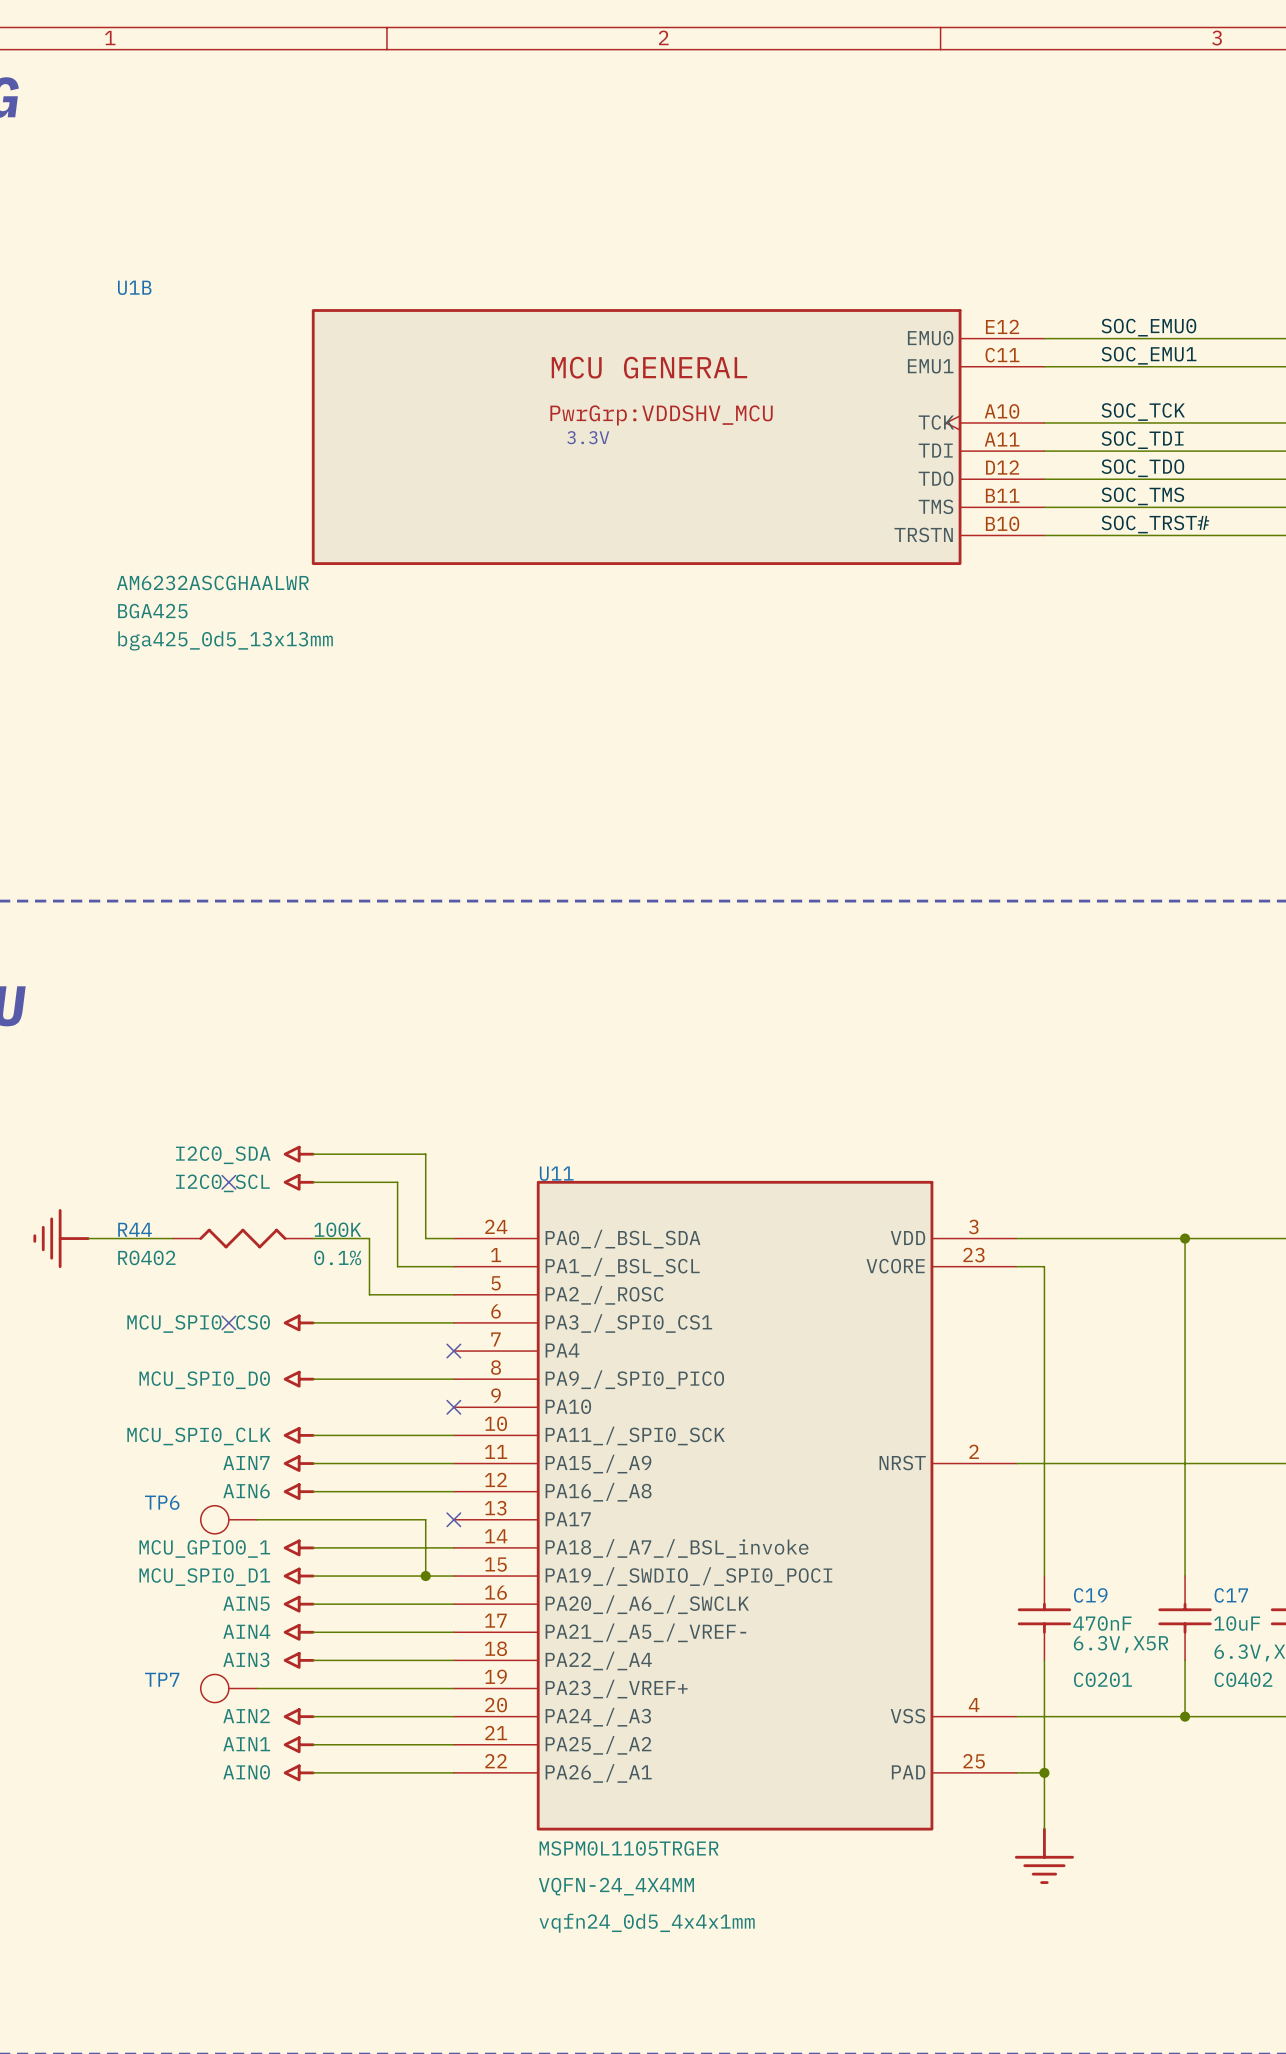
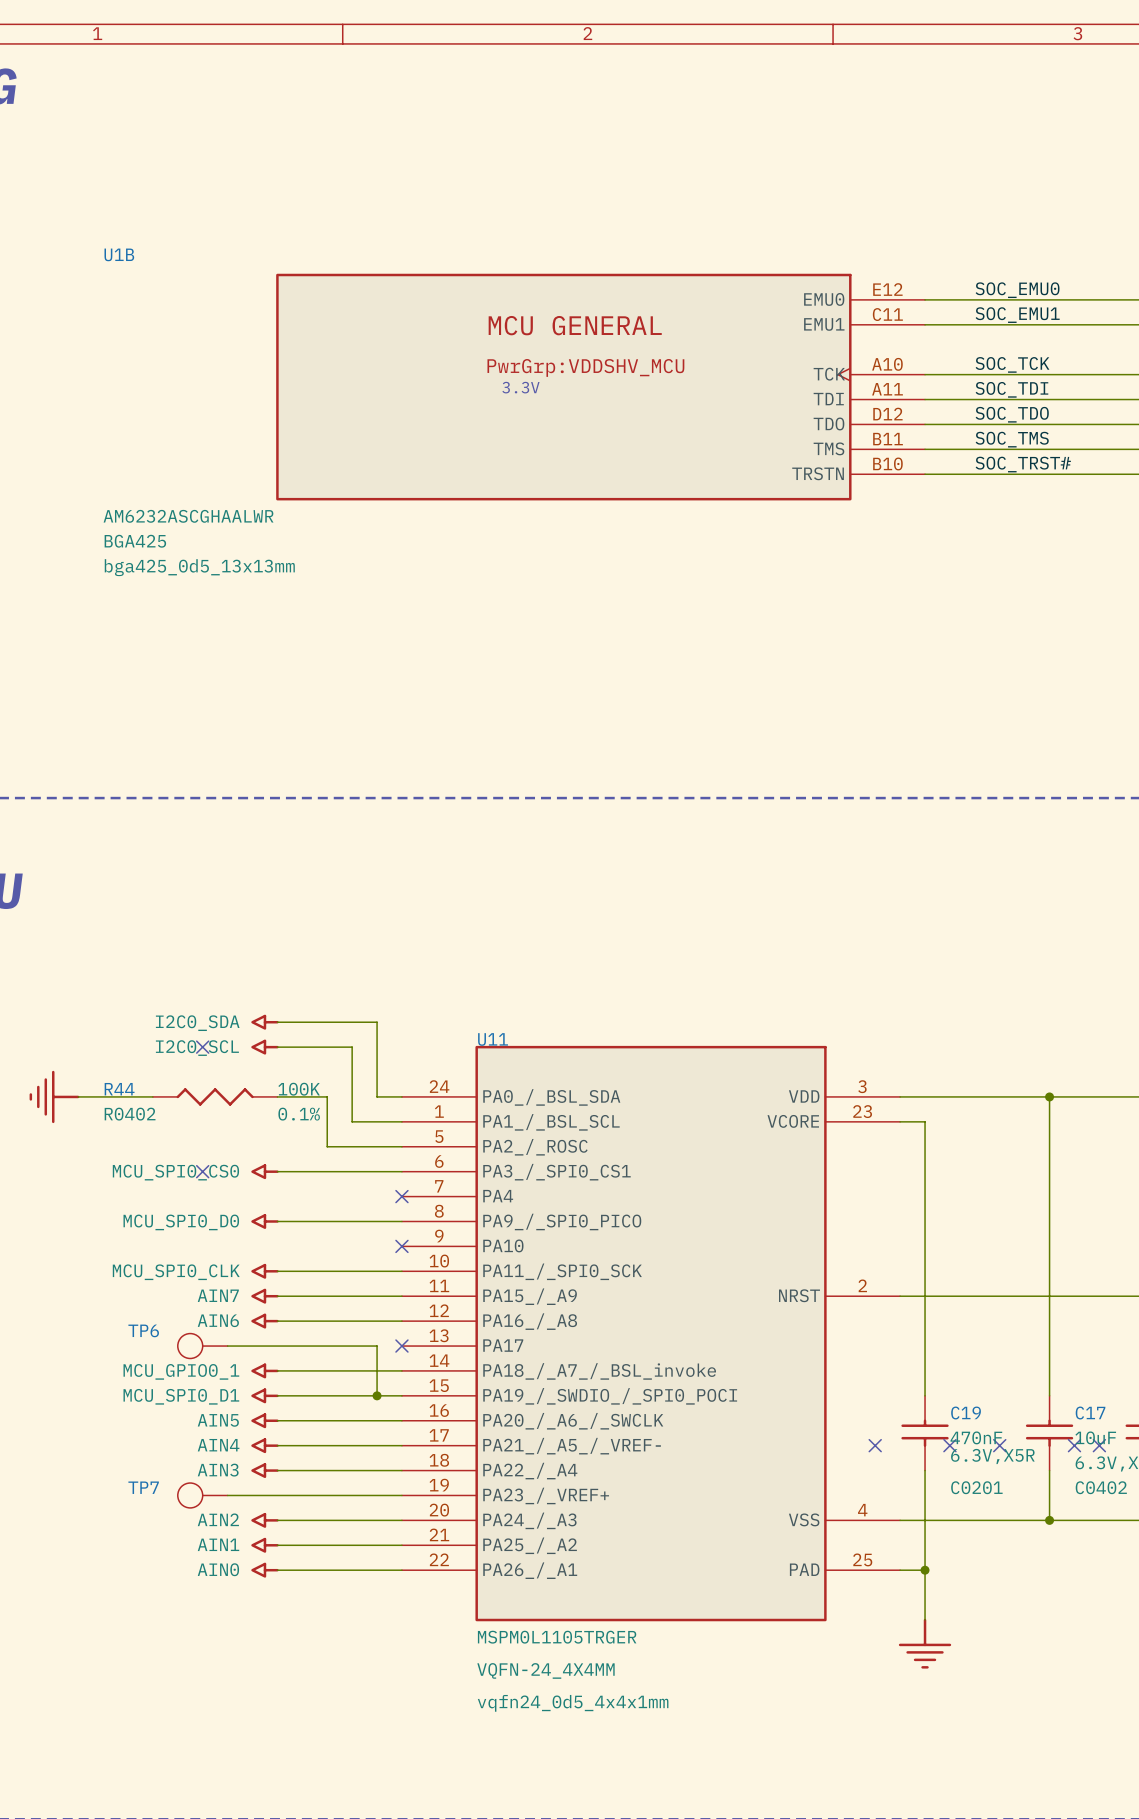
no-connect mark: none -> (875, 1445)
no-connect mark: none -> (949, 1445)
no-connect mark: none -> (999, 1445)
no-connect mark: none -> (1074, 1445)
no-connect mark: none -> (1099, 1445)

